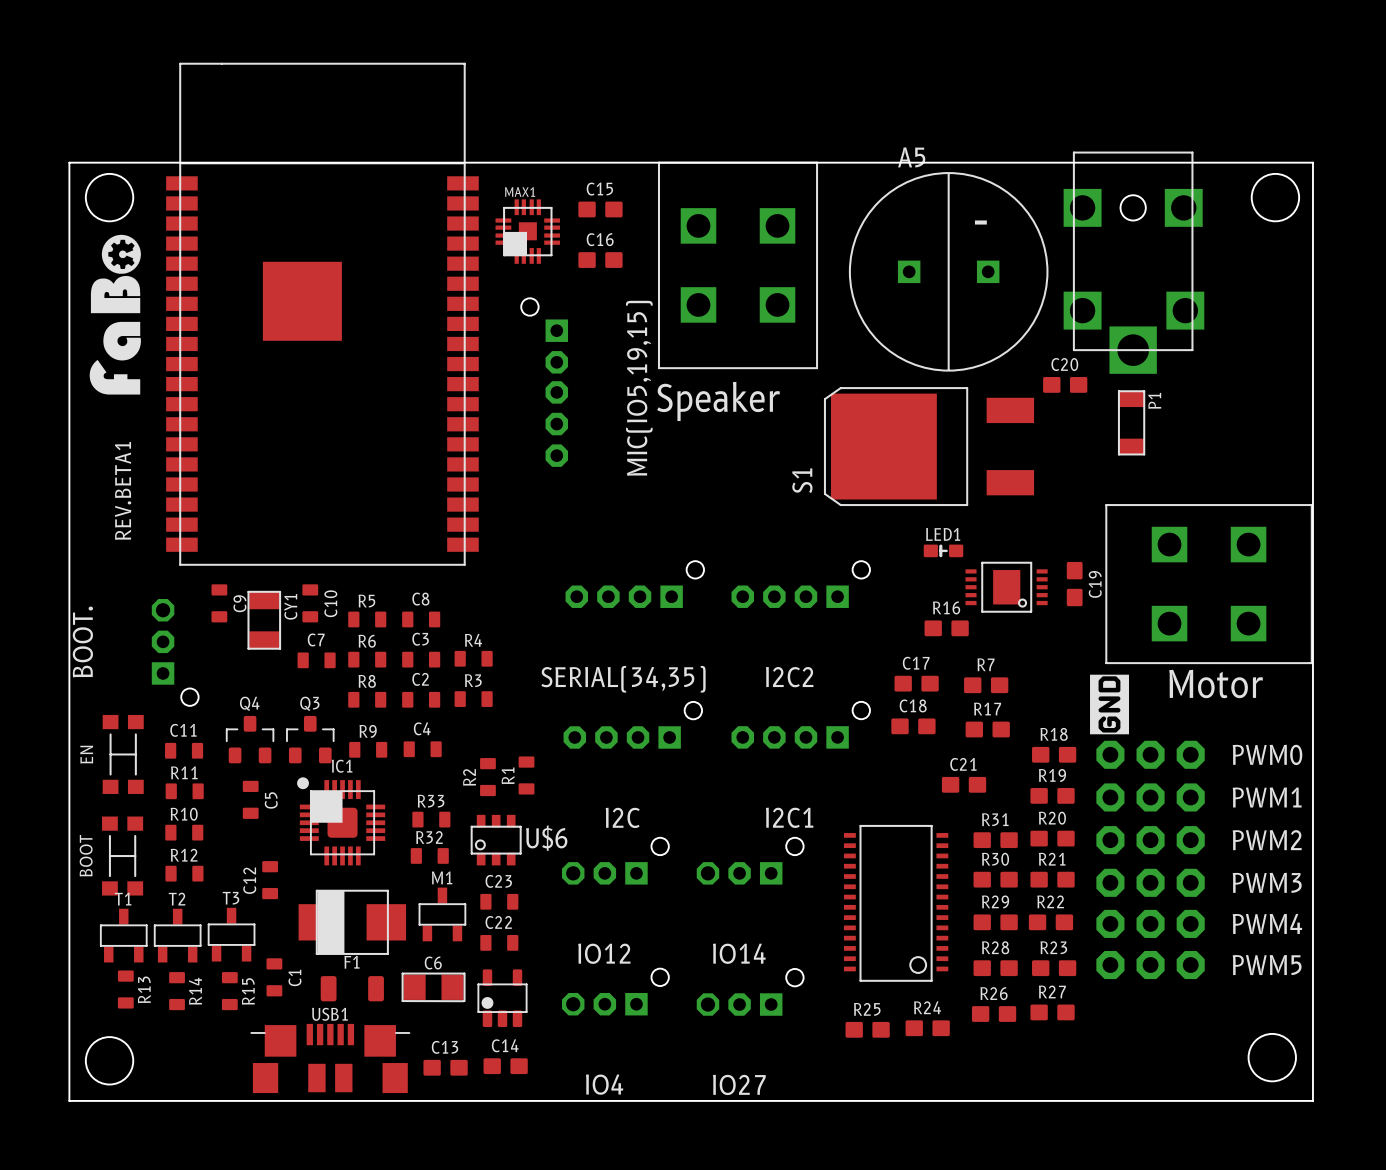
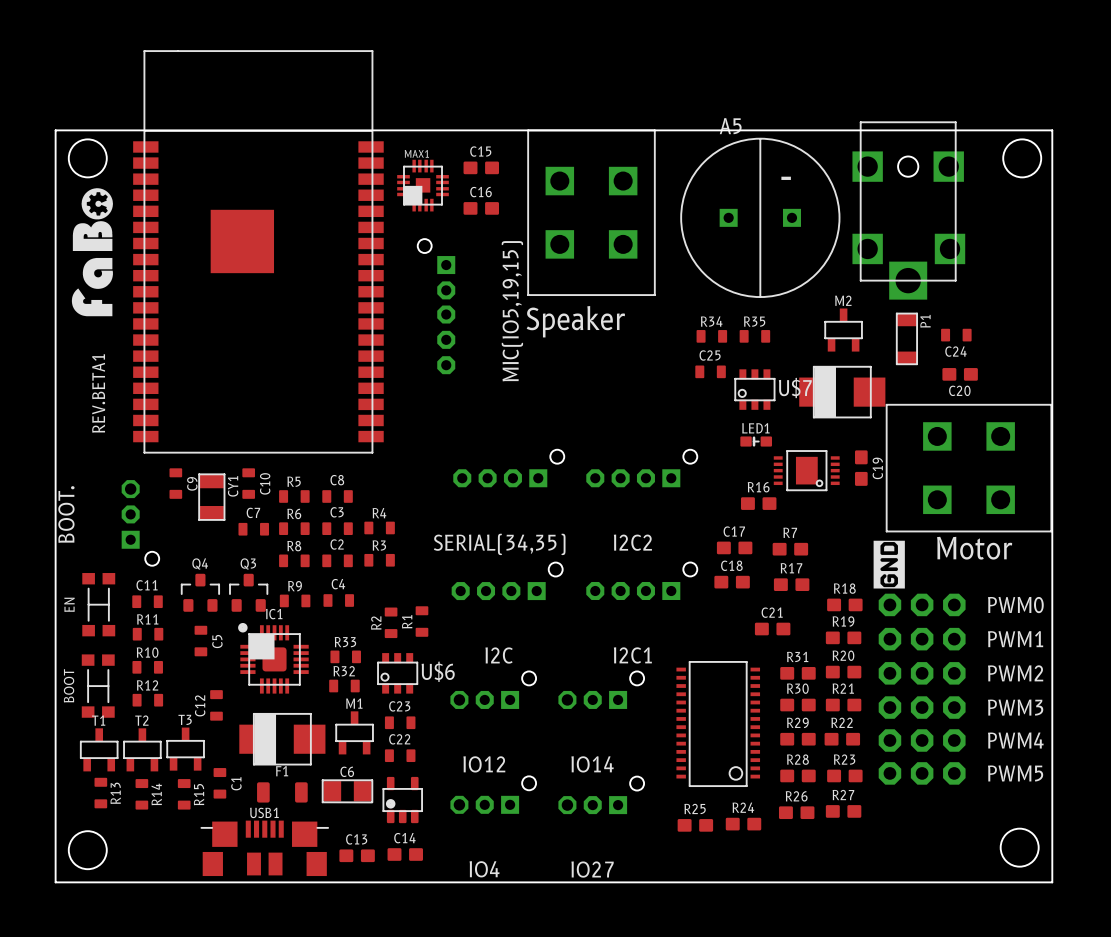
C20 name position: C20 (1064, 364) -> C20 (959, 390)
C20 position: (1065, 384) -> (960, 374)
M2: none -> (843, 330)
C24: none -> (956, 335)
R34: none -> (711, 336)
R35: none -> (754, 336)
S1: (929, 446) -> none
C25: none -> (710, 371)
U$7: none -> (754, 389)
part: none -> (842, 392)

